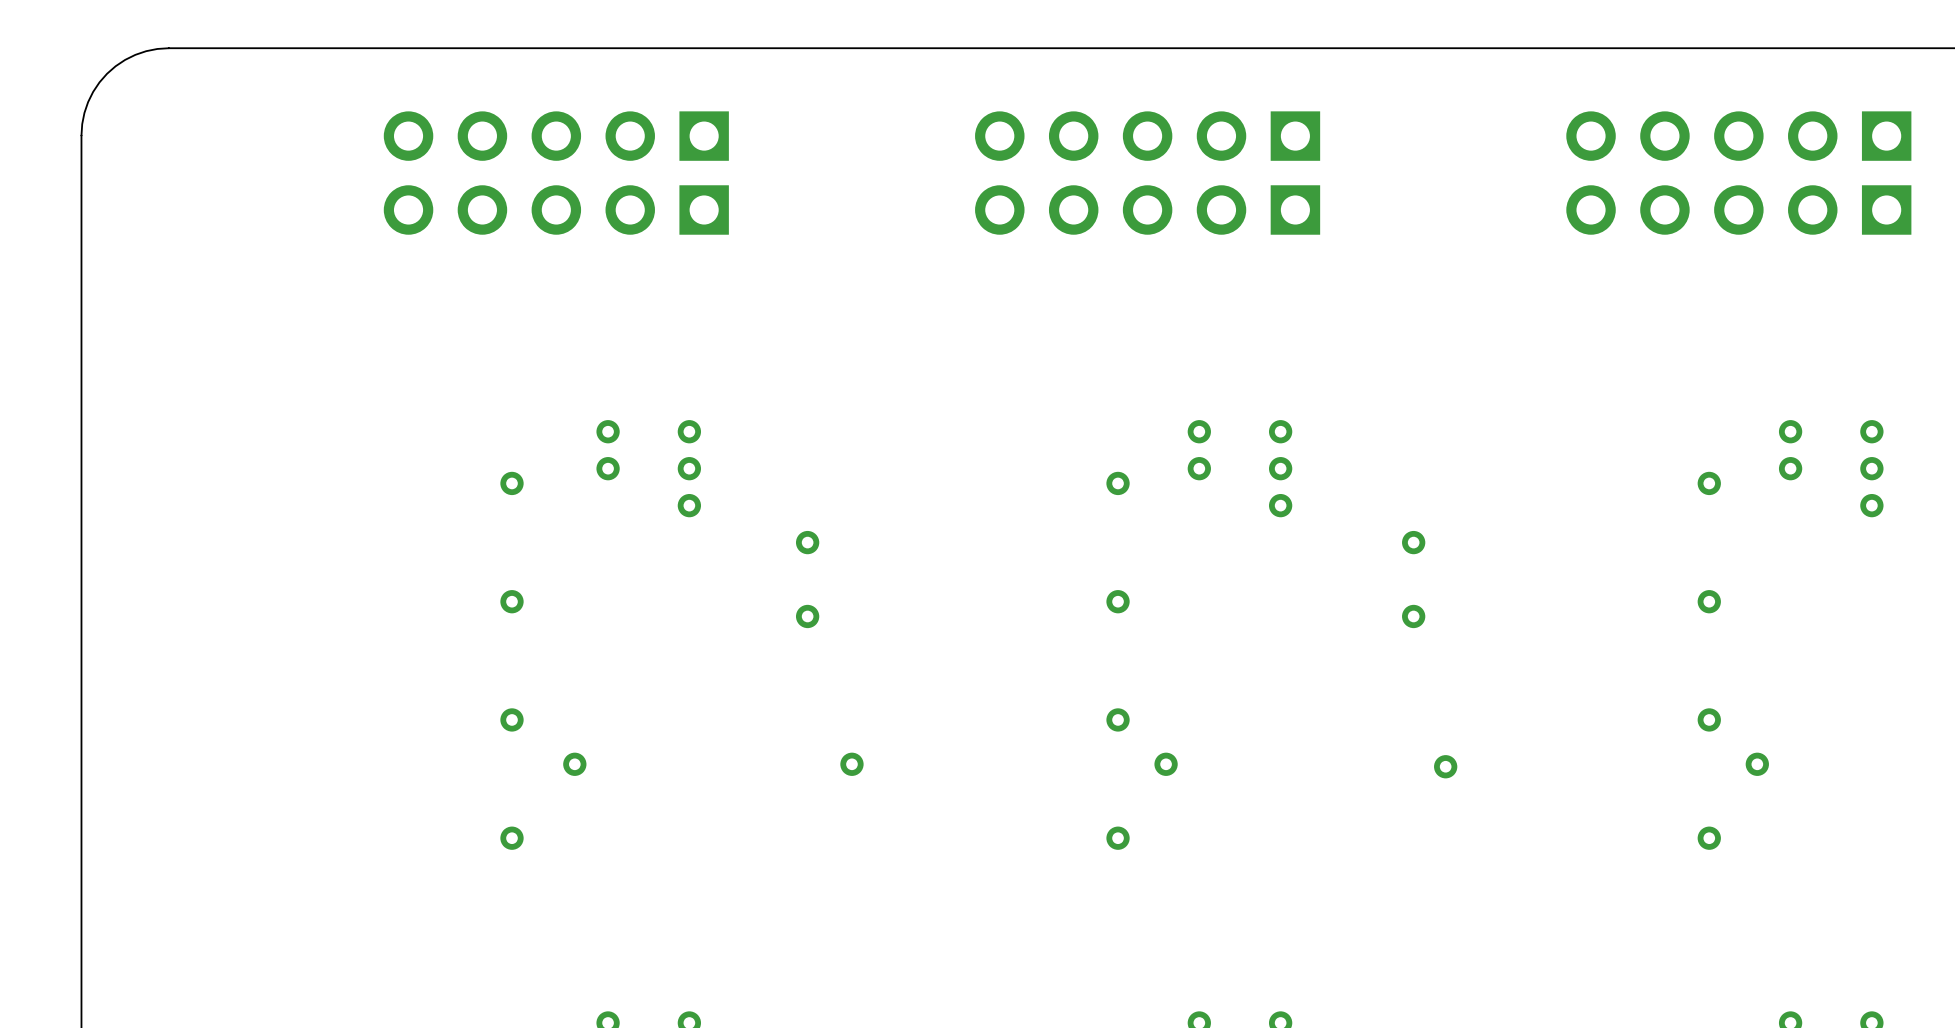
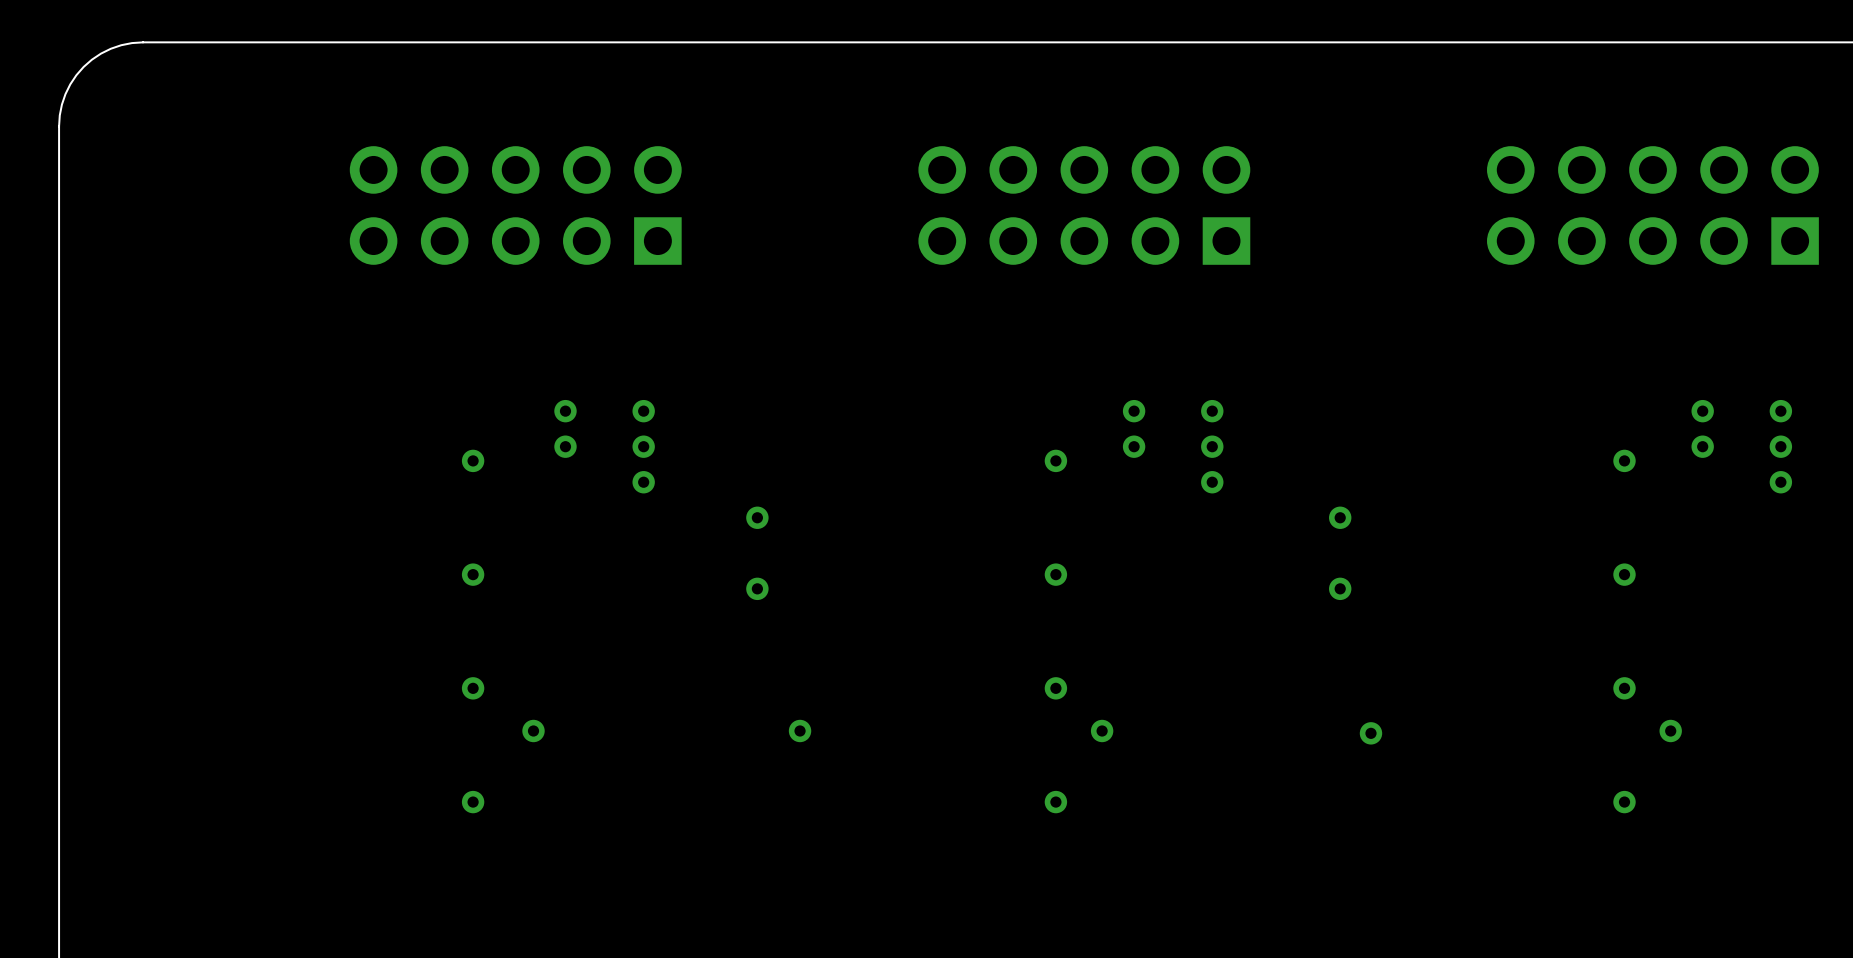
part: (556, 136) -> none
part: (1147, 136) -> none
part: (1738, 136) -> none
part footprint: [383, 185, 729, 235] -> [349, 146, 682, 265]
part footprint: [975, 185, 1321, 235] -> [918, 146, 1251, 265]
part footprint: [1566, 185, 1912, 235] -> [1487, 146, 1819, 265]

